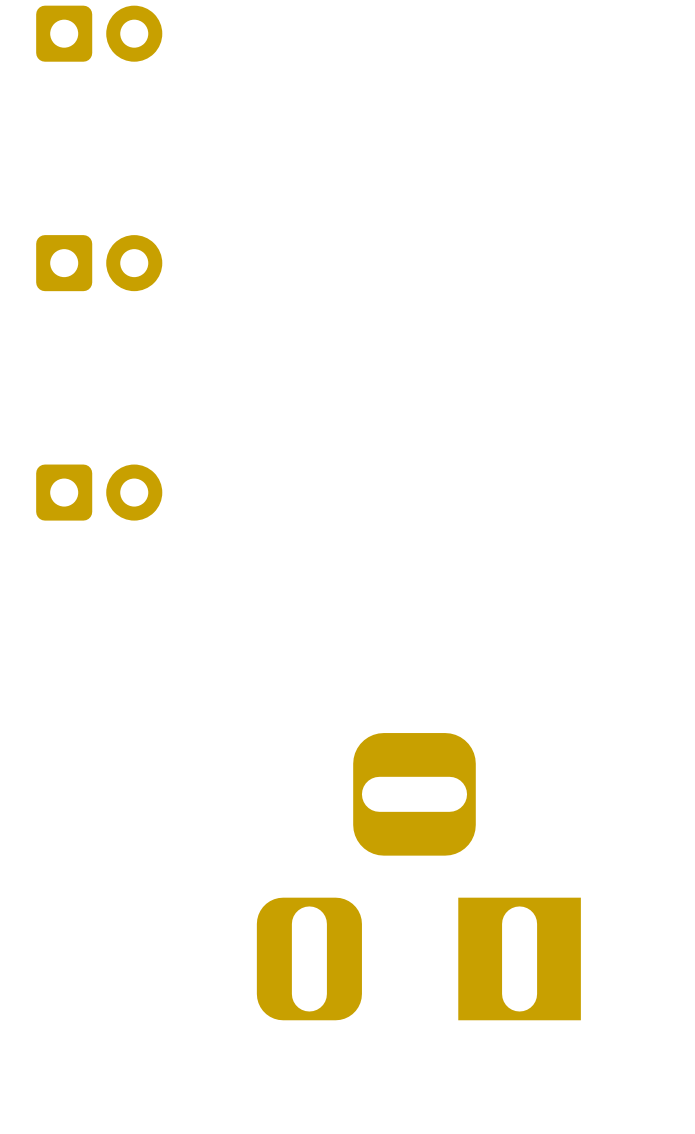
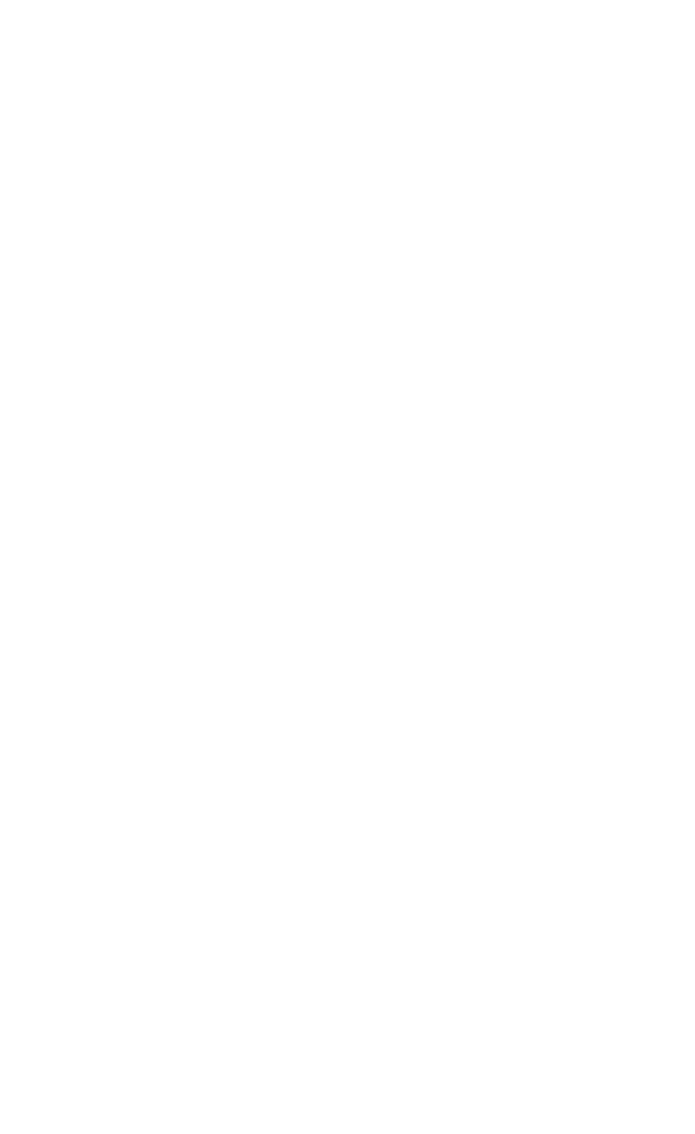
part: (99, 33) -> none
part: (99, 263) -> none
part: (99, 492) -> none
part: (418, 876) -> none

